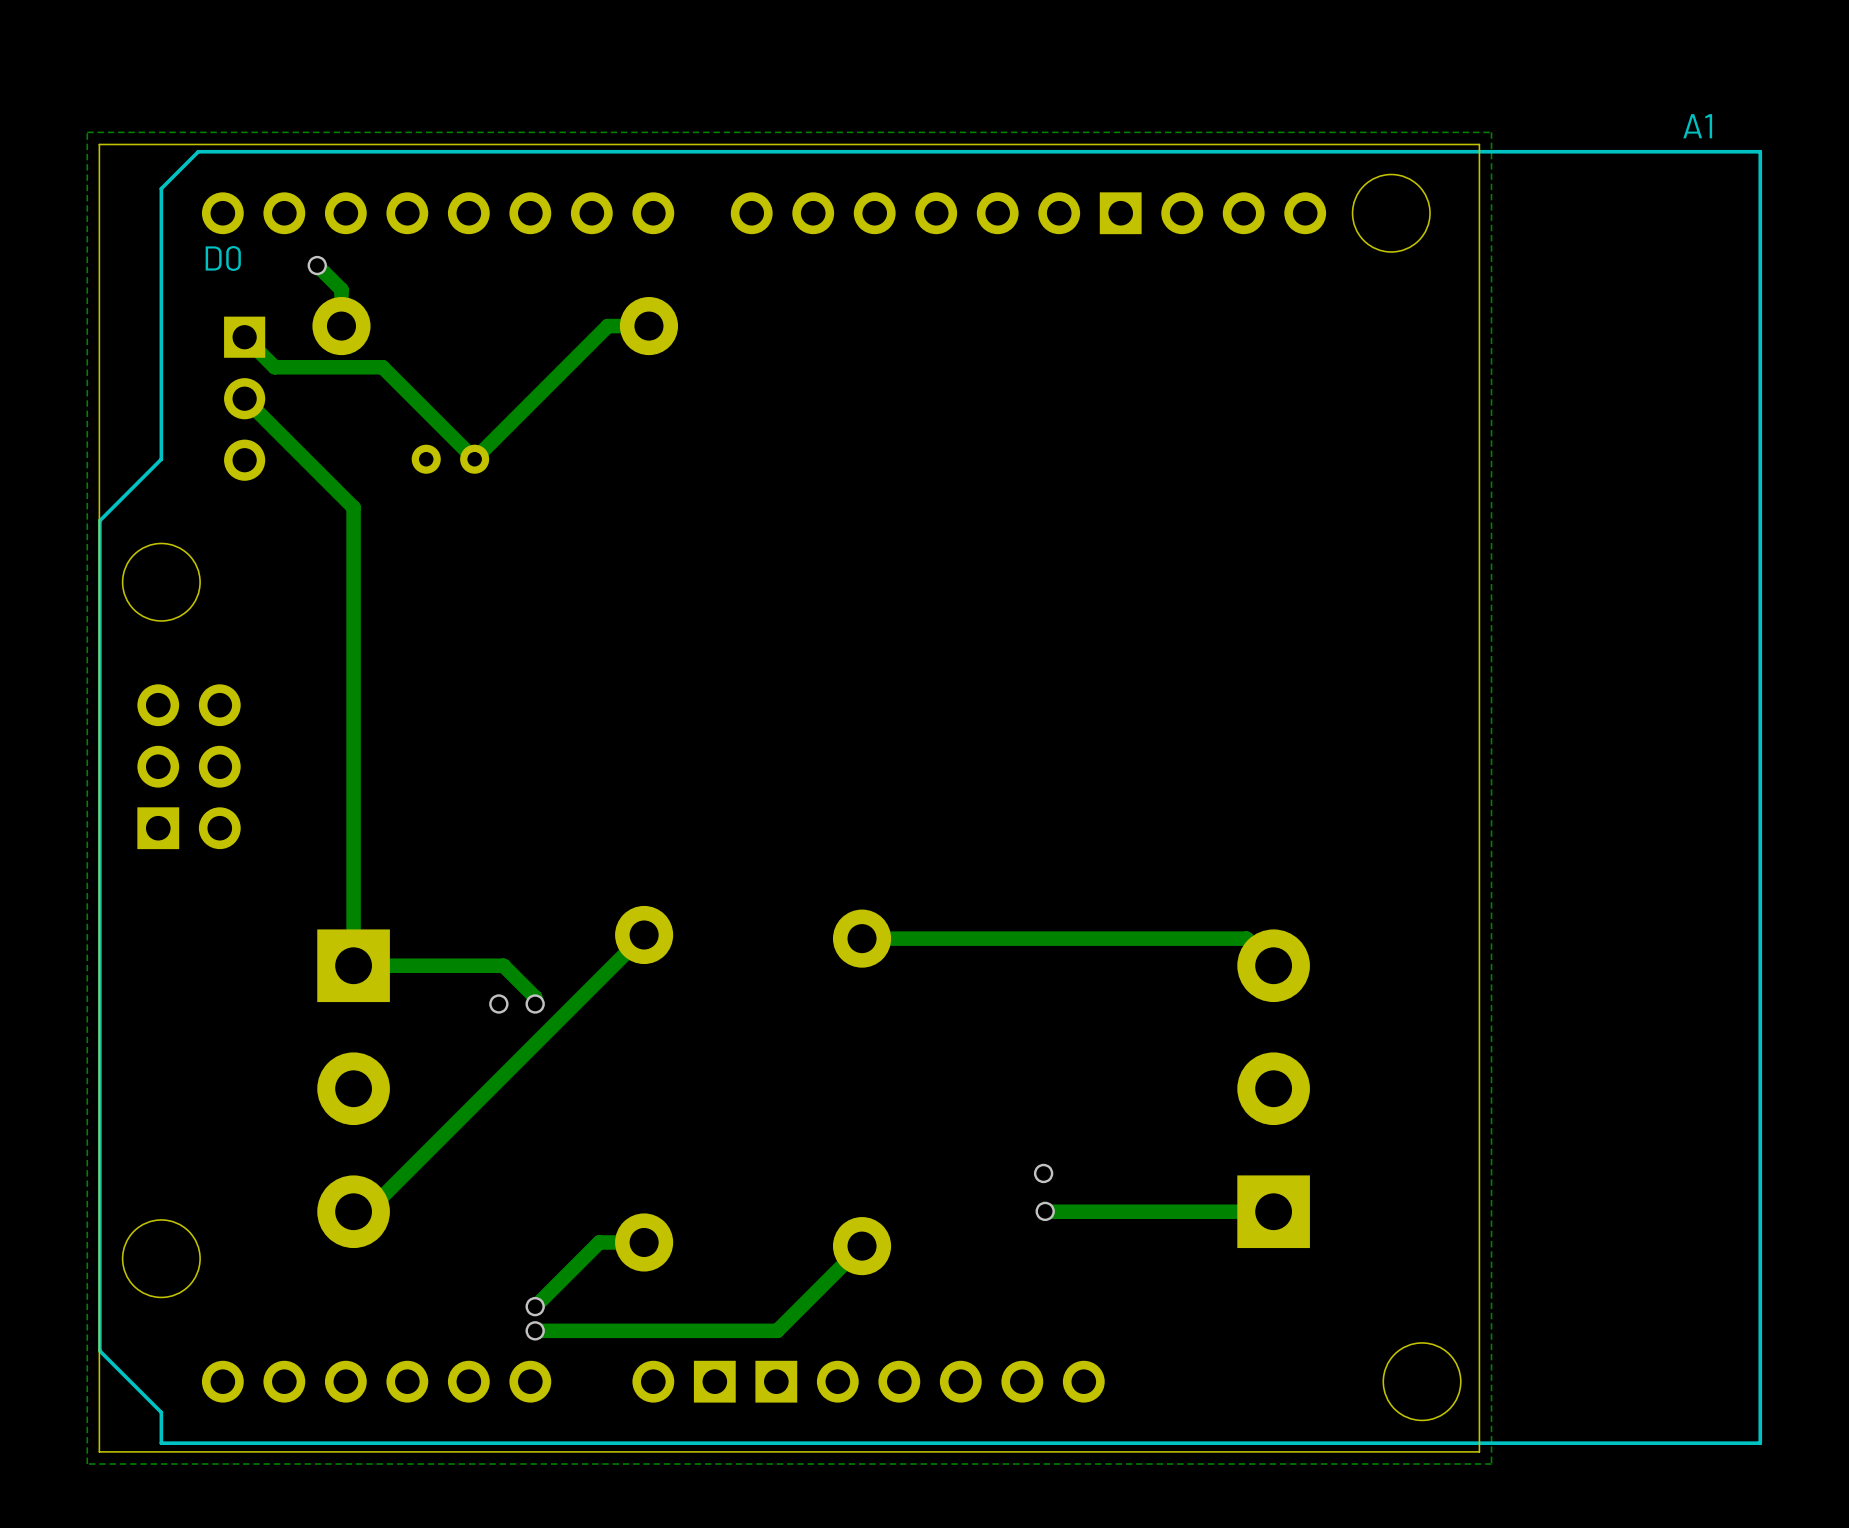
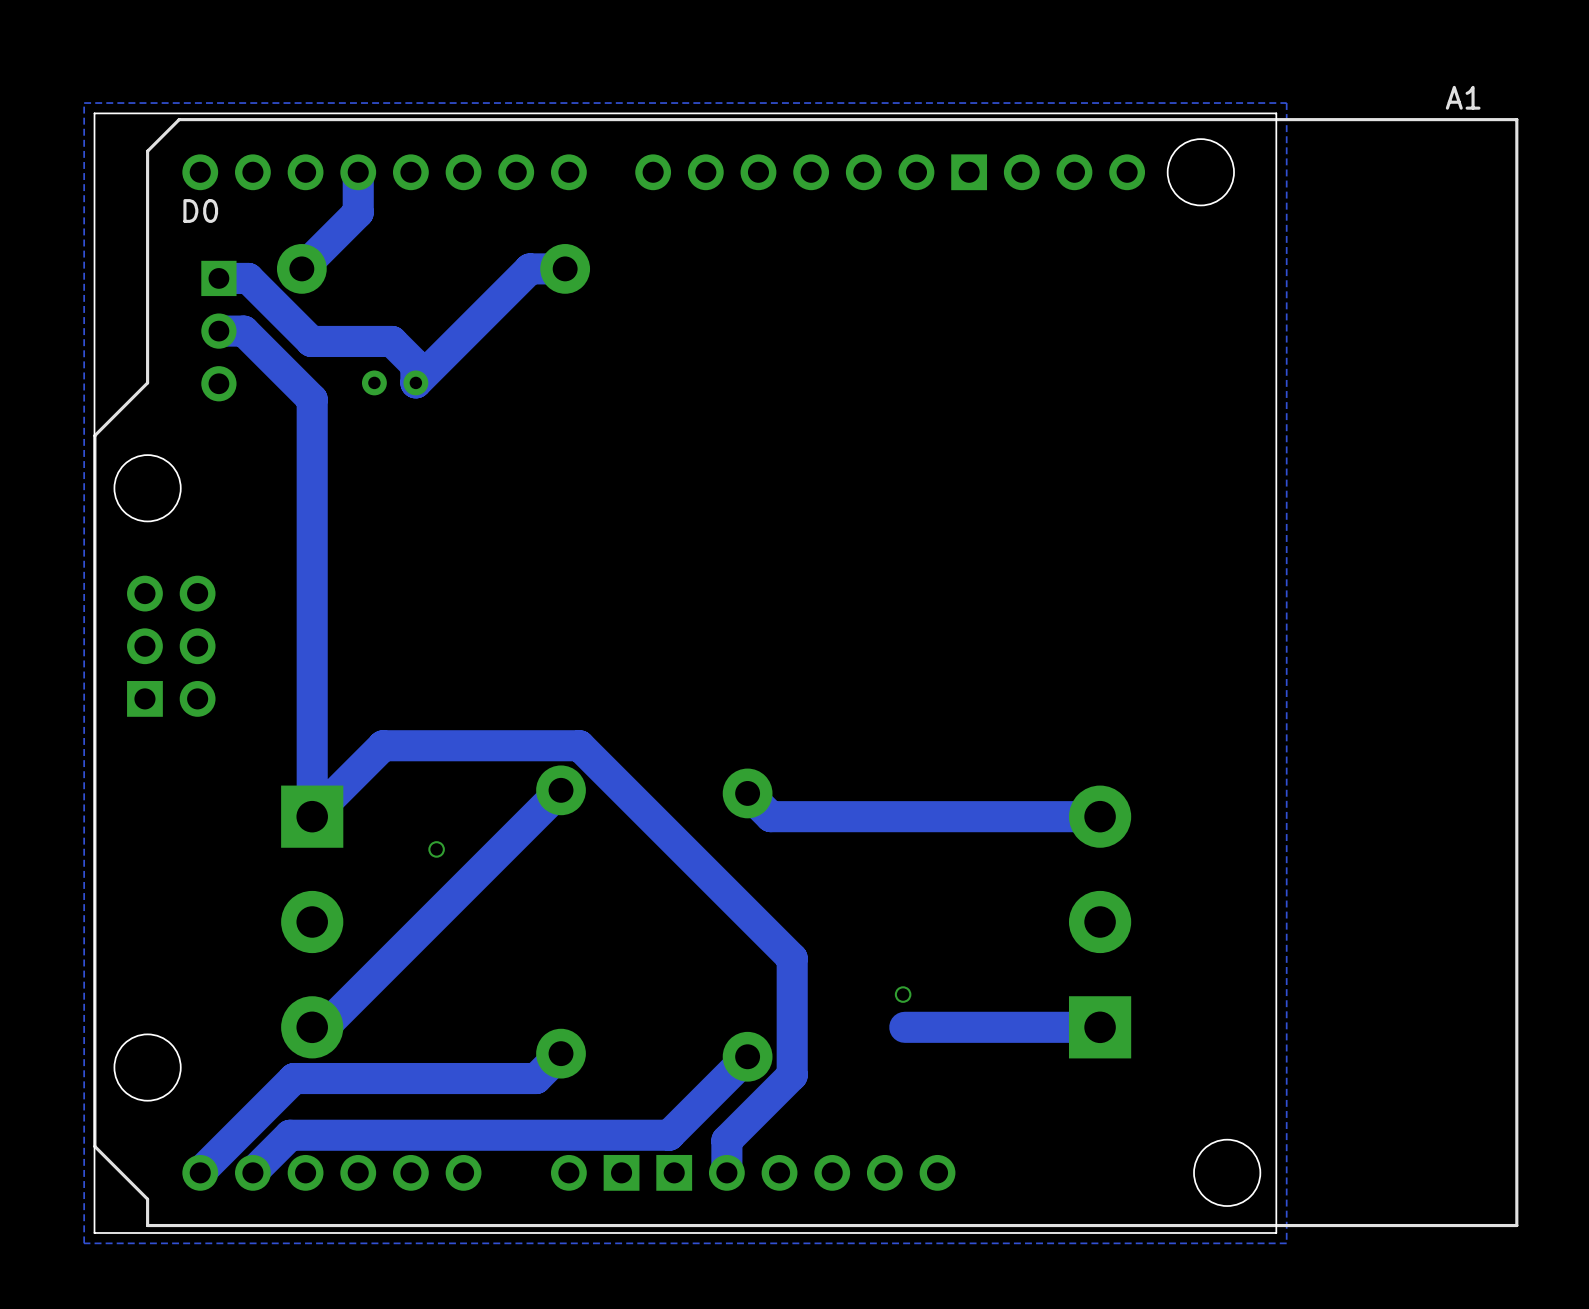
track: (317, 265) (341, 289) (341, 326) -> (358, 172) (358, 212) (301, 268)
via: (317, 265) -> none
track width: thin (648, 326) (607, 326) (474, 459) -> thick (565, 268) (529, 268) (415, 382)
track: (244, 337) (274, 367) (382, 367) (474, 459) -> (218, 278) (248, 278) (311, 341) (392, 341) (415, 365) (415, 382)
track: (244, 398) (353, 507) -> (218, 331) (243, 331) (312, 399) (312, 424)
track width: thin (353, 507) (353, 965) -> thick (312, 424) (312, 816)
track width: thin (644, 934) (367, 1211) (353, 1211) -> thick (561, 790) (324, 1027) (312, 1027)
track: (862, 938) (1246, 938) (1273, 965) -> (747, 793) (770, 816) (1100, 816)
track: (353, 965) (503, 965) (535, 997) (535, 1003) -> (312, 816) (383, 745) (579, 745) (792, 958) (792, 1075) (726, 1140) (726, 1172)
via: (535, 1003) -> none
via: (1045, 1211) -> none
track width: thin (1273, 1211) (1045, 1211) -> thick (1100, 1027) (904, 1027)
track: (644, 1242) (599, 1242) (535, 1306) -> (561, 1053) (536, 1078) (294, 1078) (200, 1172)
track width: thin (862, 1246) (777, 1330) -> thick (747, 1056) (675, 1129)
via: (535, 1306) -> none
via: (535, 1330) -> none
track: (777, 1330) (535, 1330) -> (675, 1129) (669, 1135) (289, 1135) (252, 1172)

